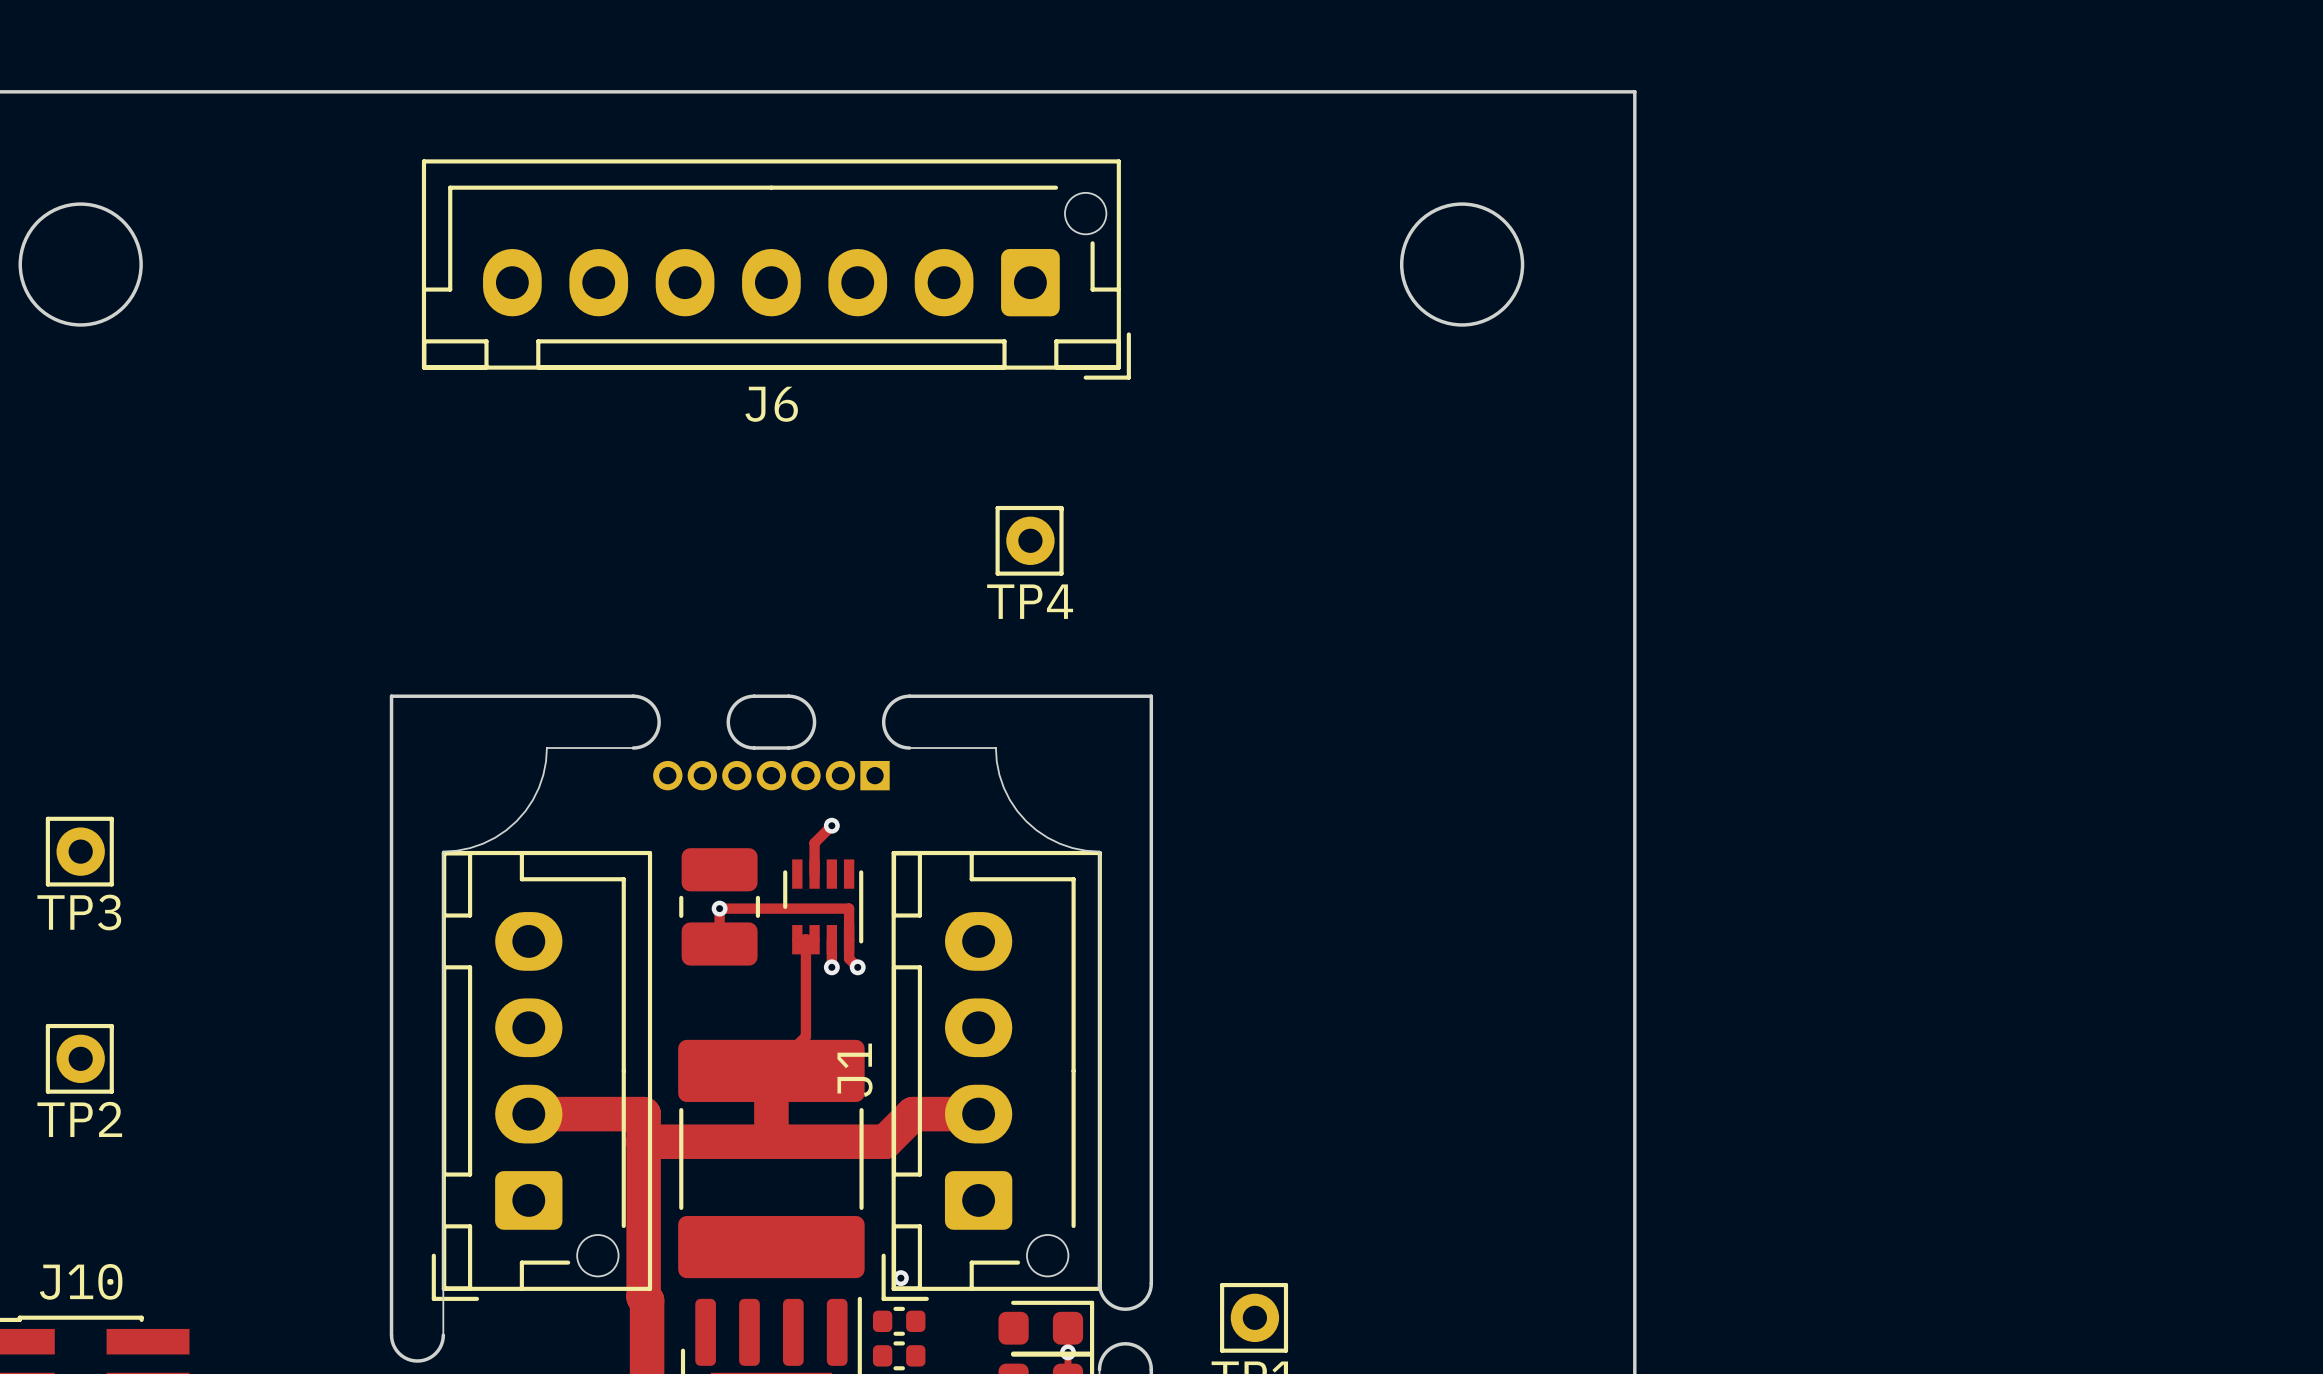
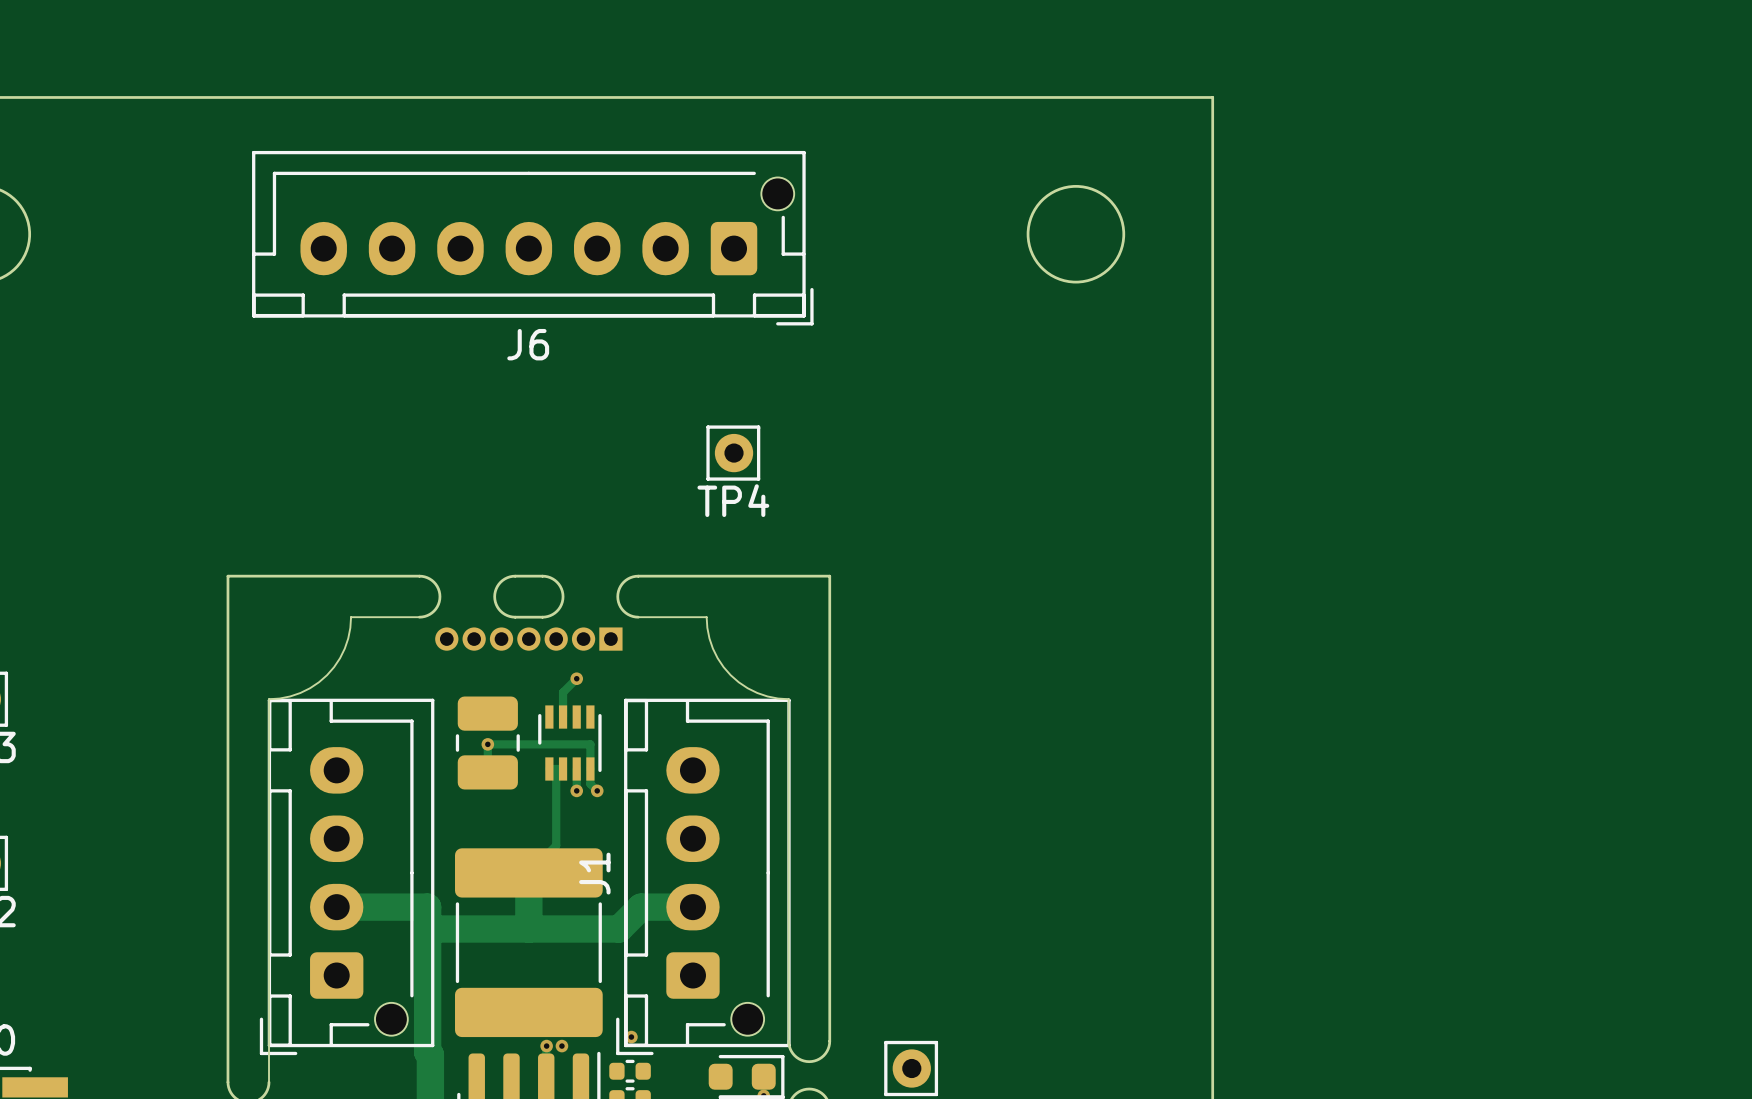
via: none -> (546, 1046)
via: none -> (561, 1046)

